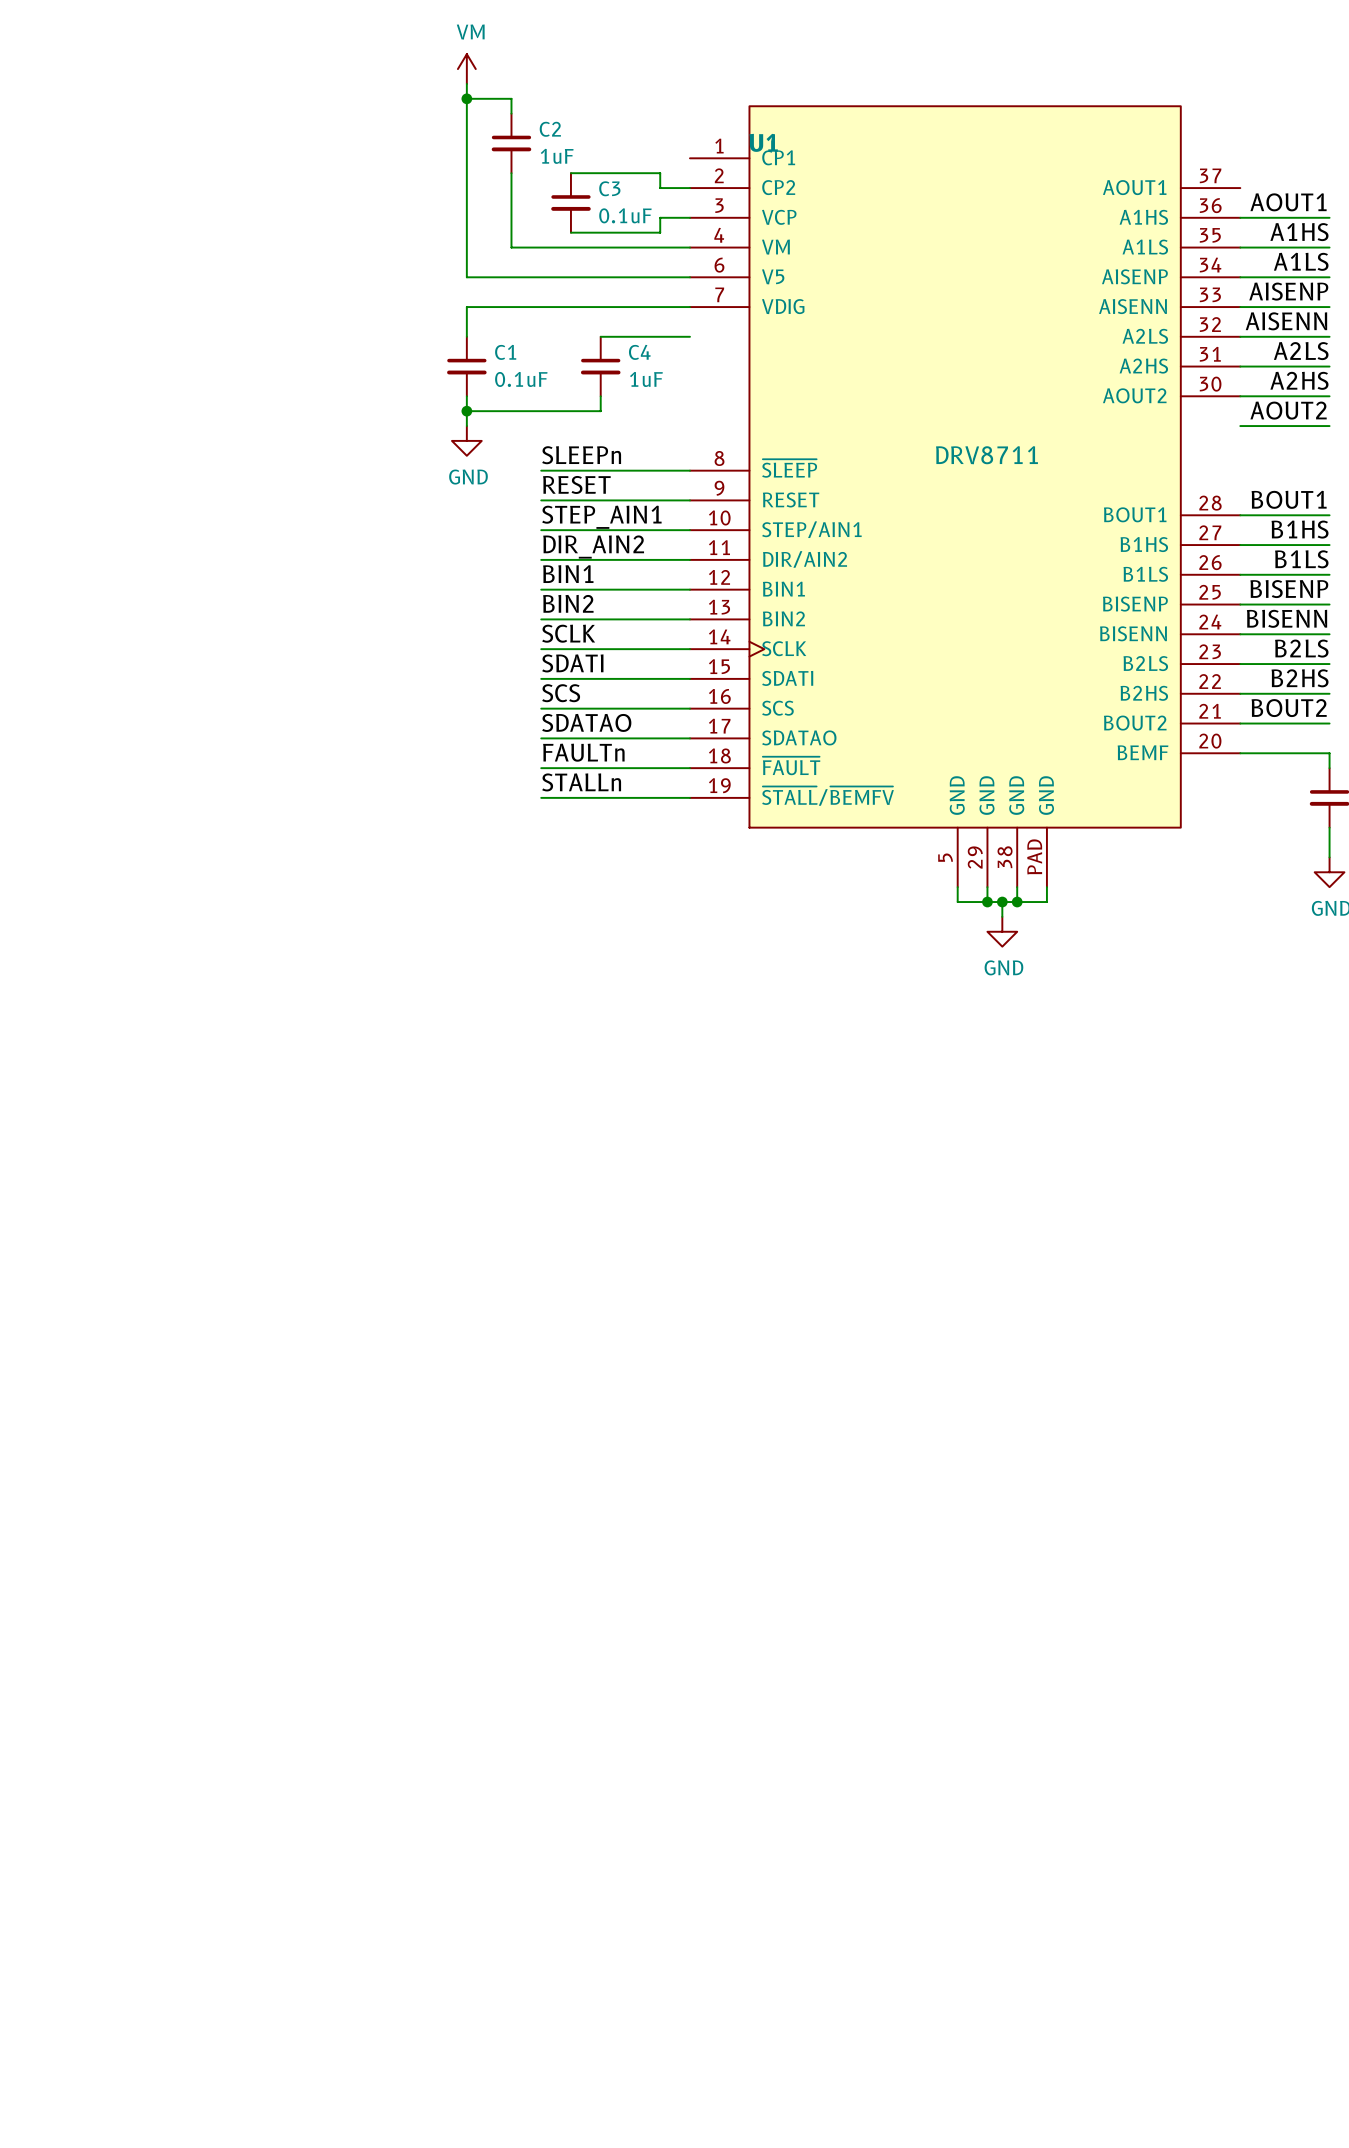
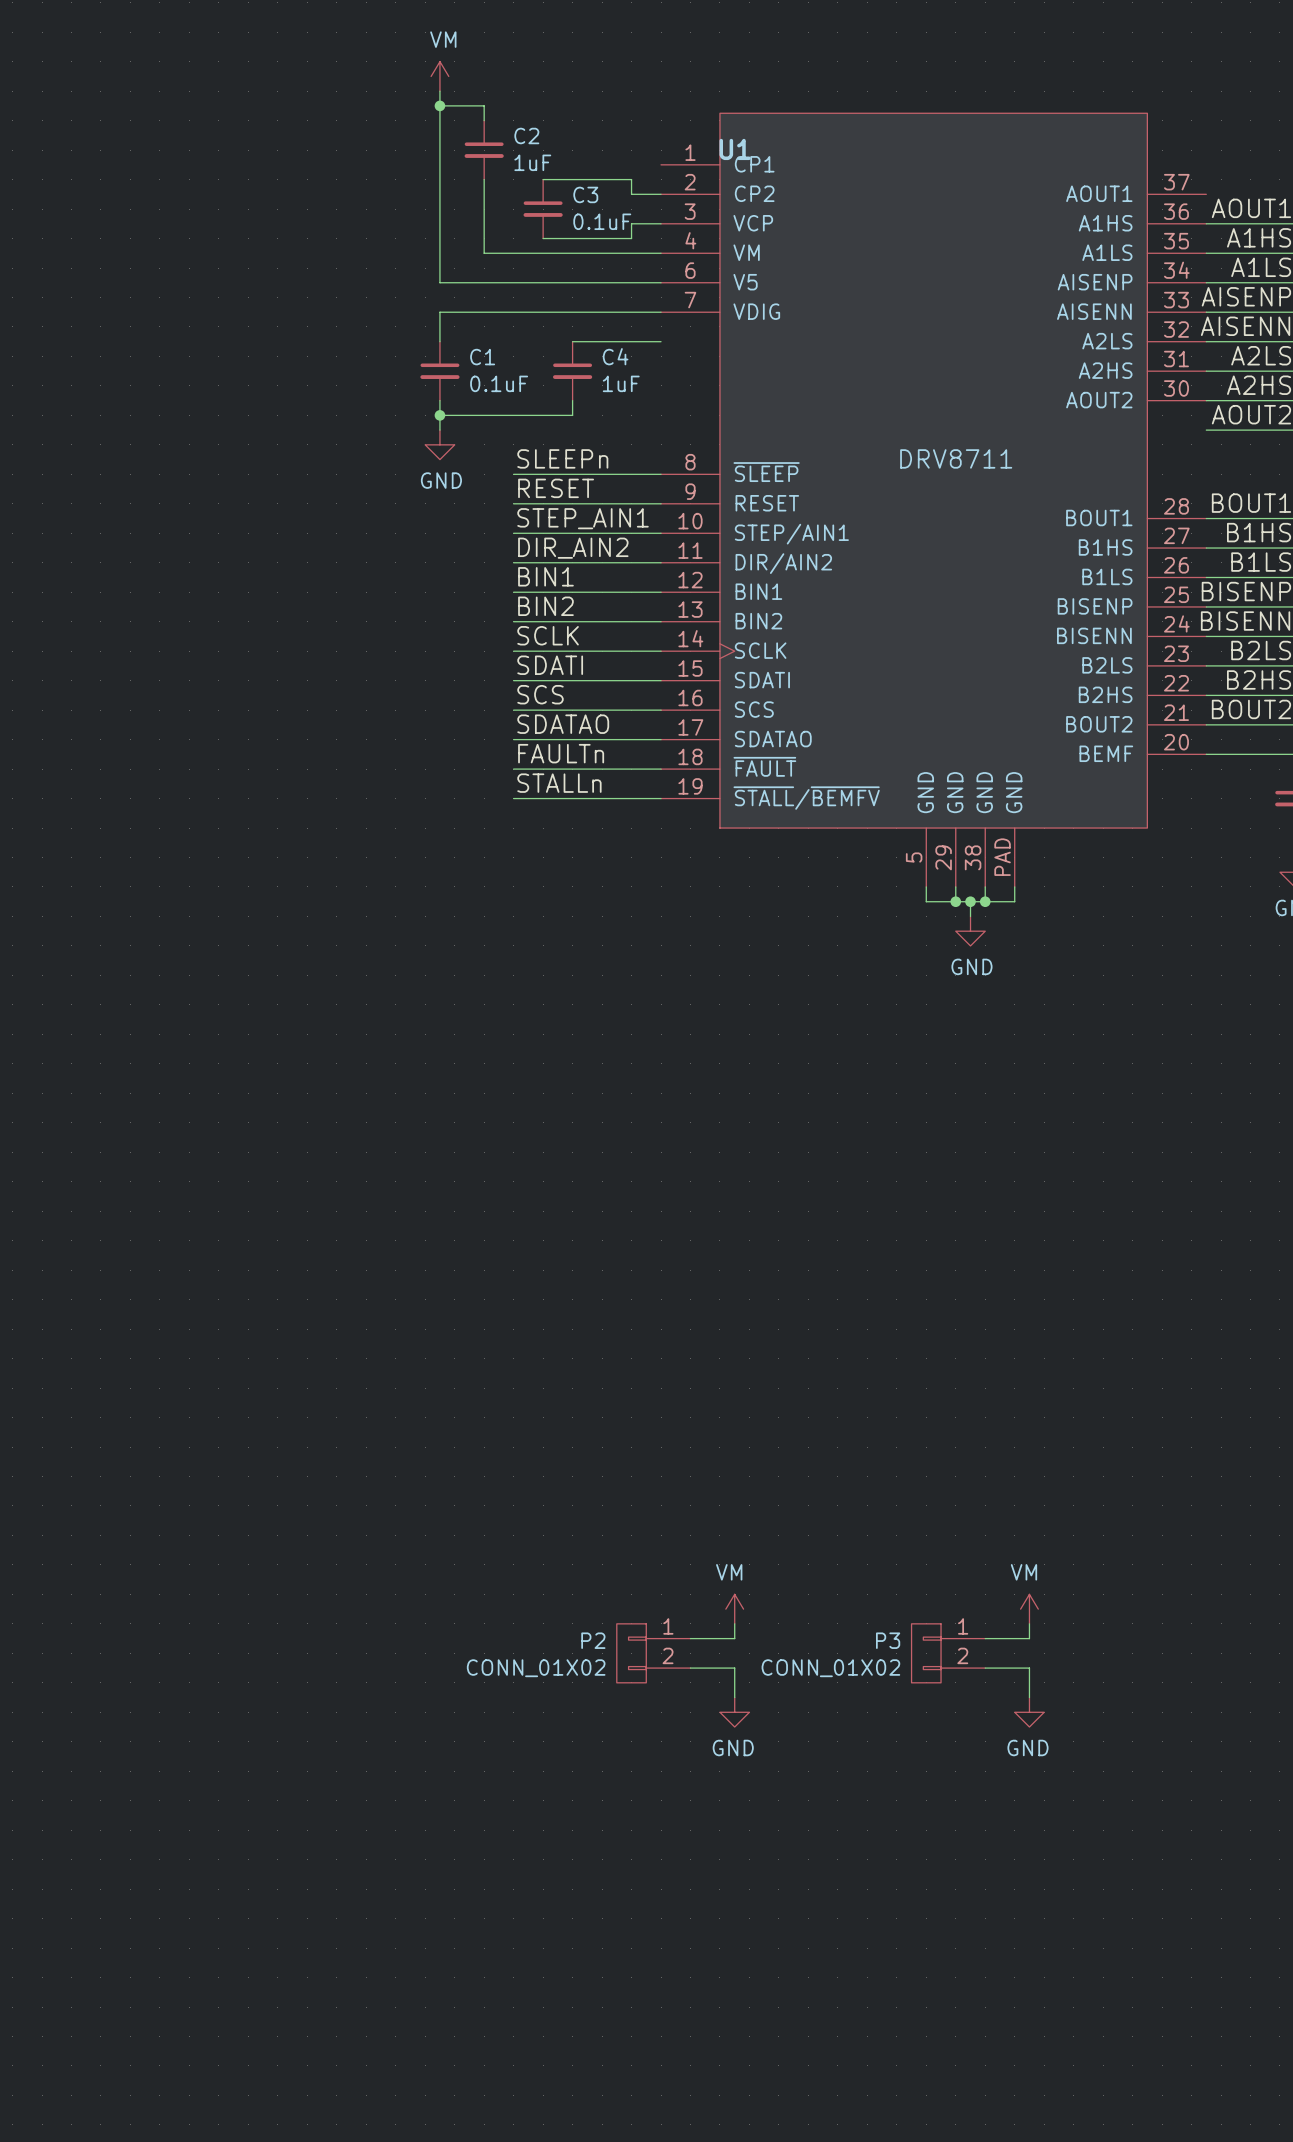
power symbol: none -> VM (734, 1609)
power symbol: none -> VM (1029, 1609)
wire: none -> (734, 1623) (734, 1638) (690, 1638)
wire: none -> (1029, 1623) (1029, 1638) (985, 1638)
P2: none -> CONN_01X02 (653, 1653)
P3: none -> CONN_01X02 (948, 1653)
wire: none -> (690, 1668) (734, 1668) (734, 1697)
wire: none -> (985, 1668) (1029, 1668) (1029, 1697)
power symbol: none -> GND (734, 1712)
power symbol: none -> GND (1029, 1712)

